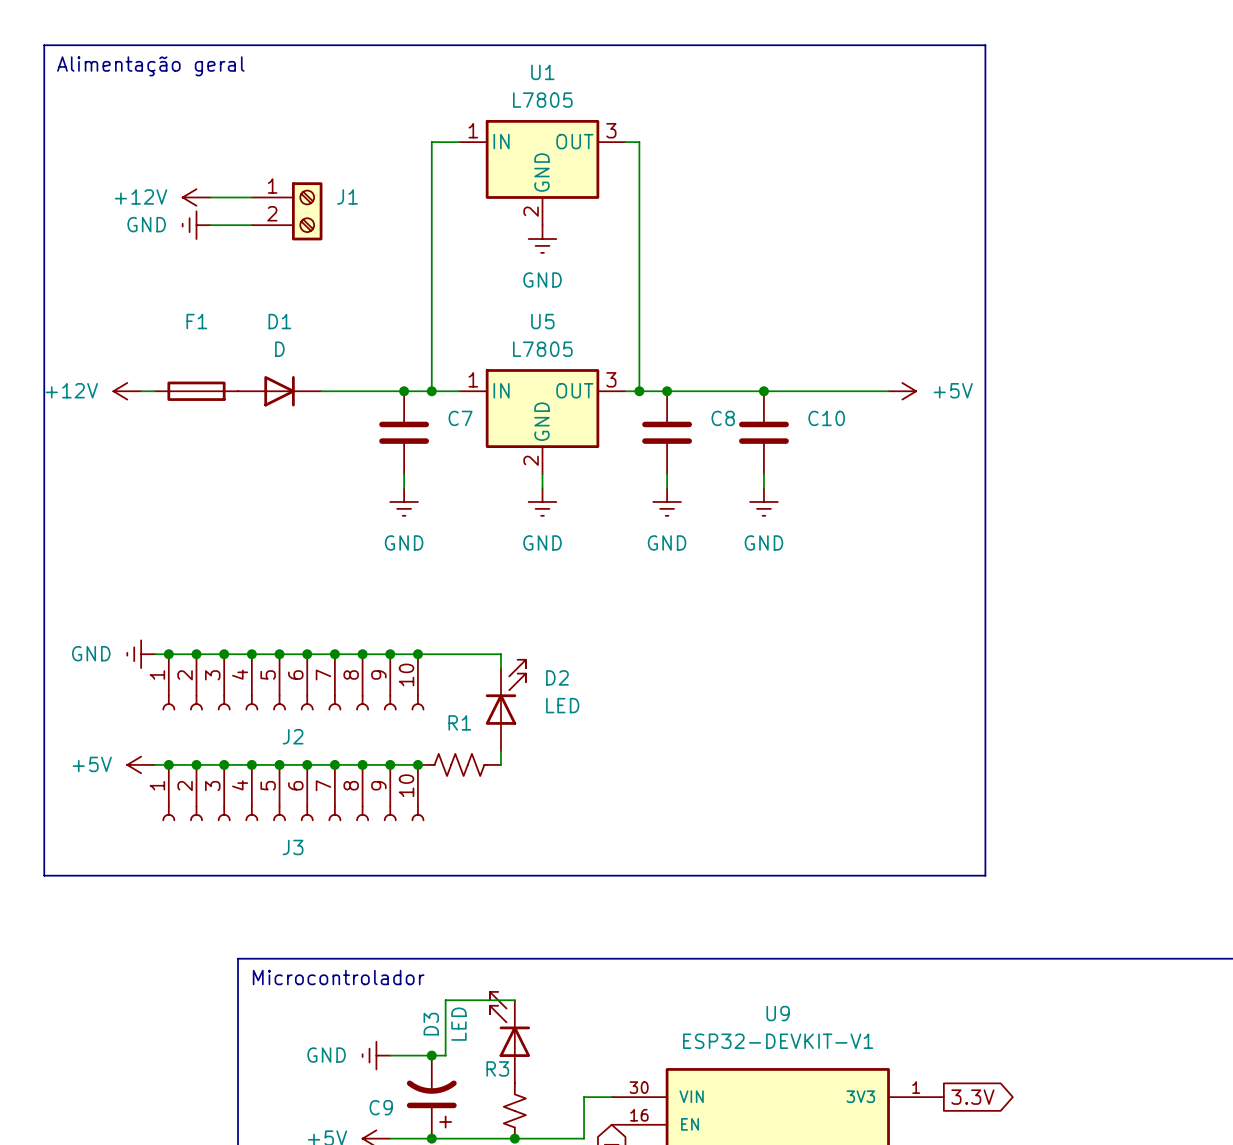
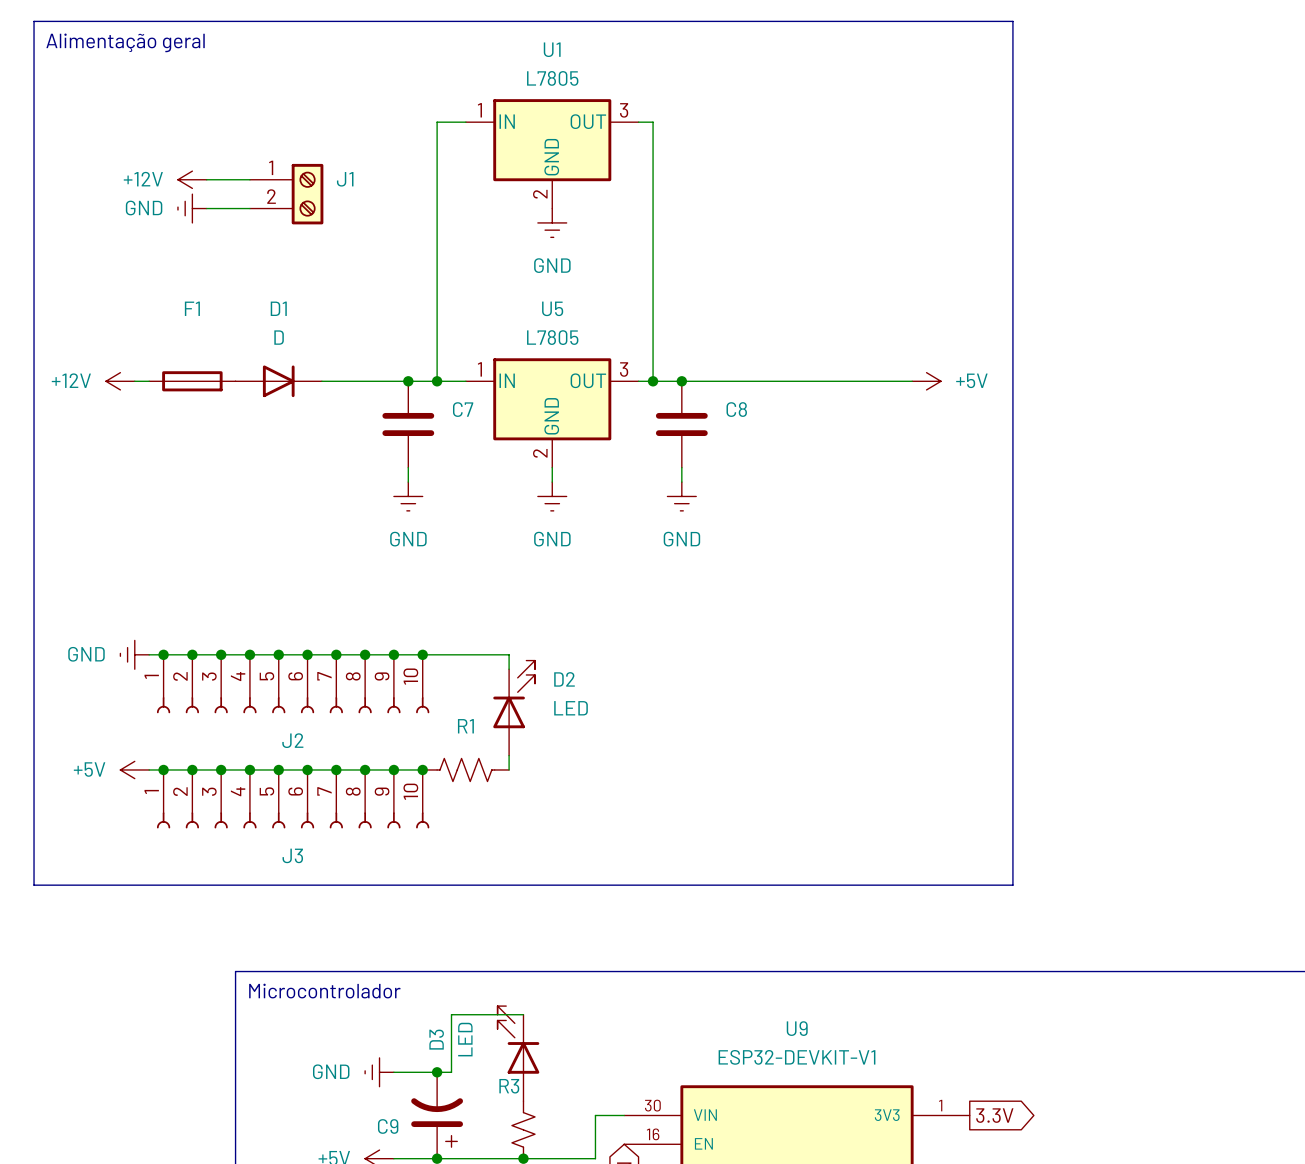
junction: (763, 391) -> none
C10: (763, 432) -> none
wire: (763, 474) (763, 488) -> none
power symbol: GND (763, 501) -> none

